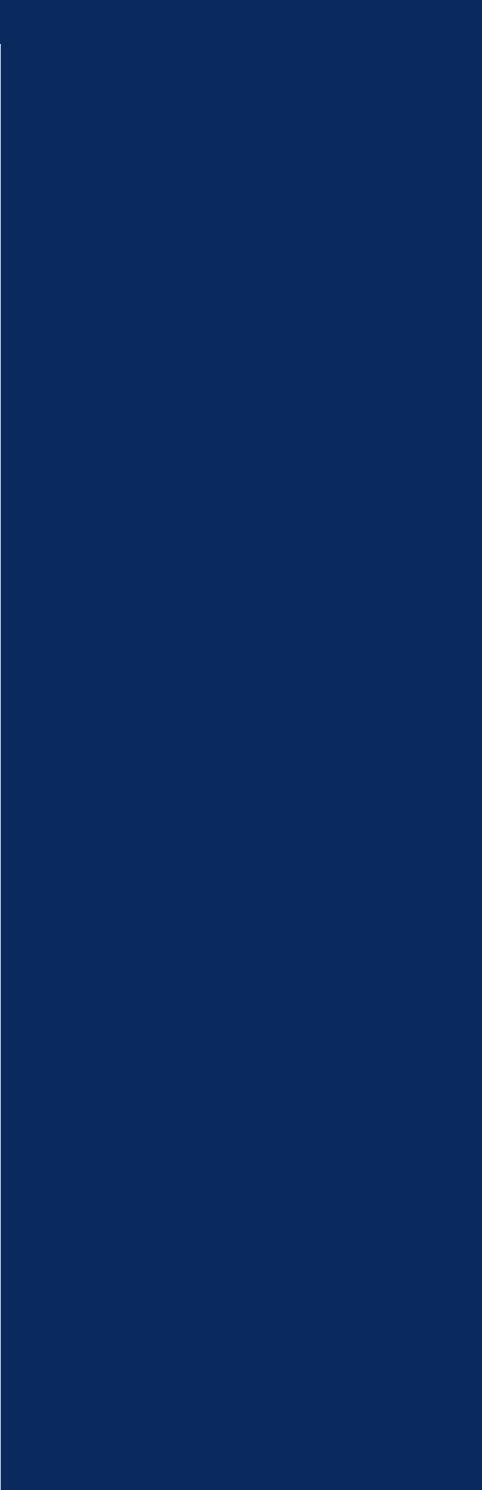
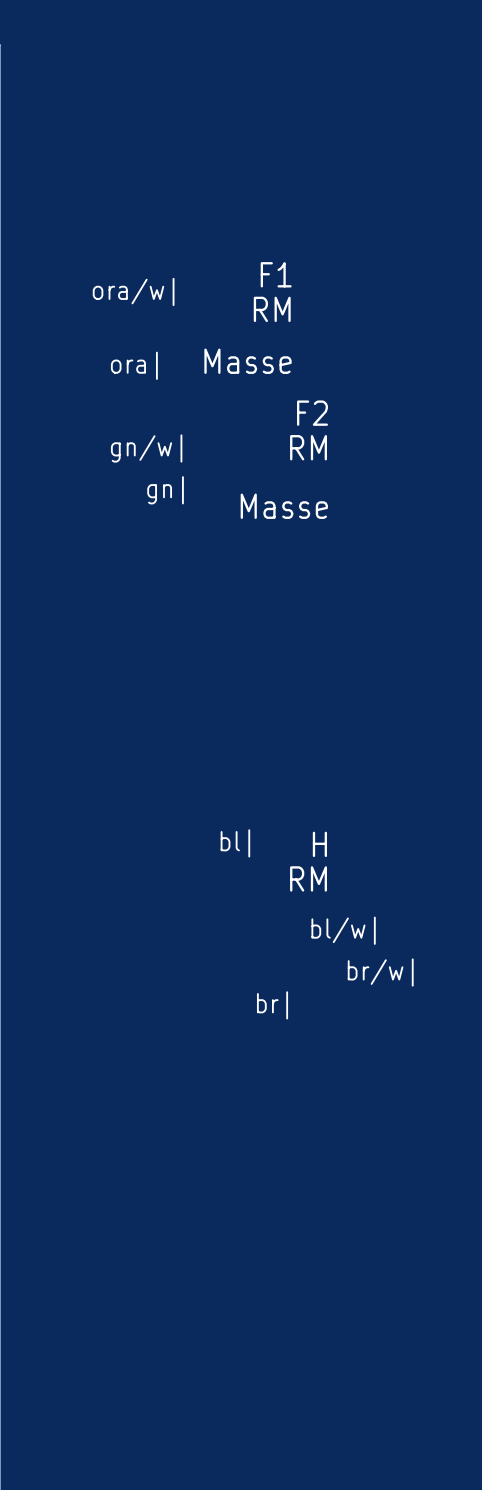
text: none -> F1 (276, 274)
text: none -> ora/w| (133, 291)
text: none -> RM (272, 309)
text: none -> Masse (248, 361)
text: none -> ora| (134, 365)
text: none -> F2 (312, 413)
text: none -> RM (308, 447)
text: none -> gn/w| (146, 448)
text: none -> gn| (165, 490)
text: none -> Masse (284, 506)
text: none -> bl| (235, 843)
text: none -> H (319, 844)
text: none -> RM (308, 878)
text: none -> bl/w| (343, 930)
text: none -> br/w| (380, 972)
text: none -> br| (272, 1005)

